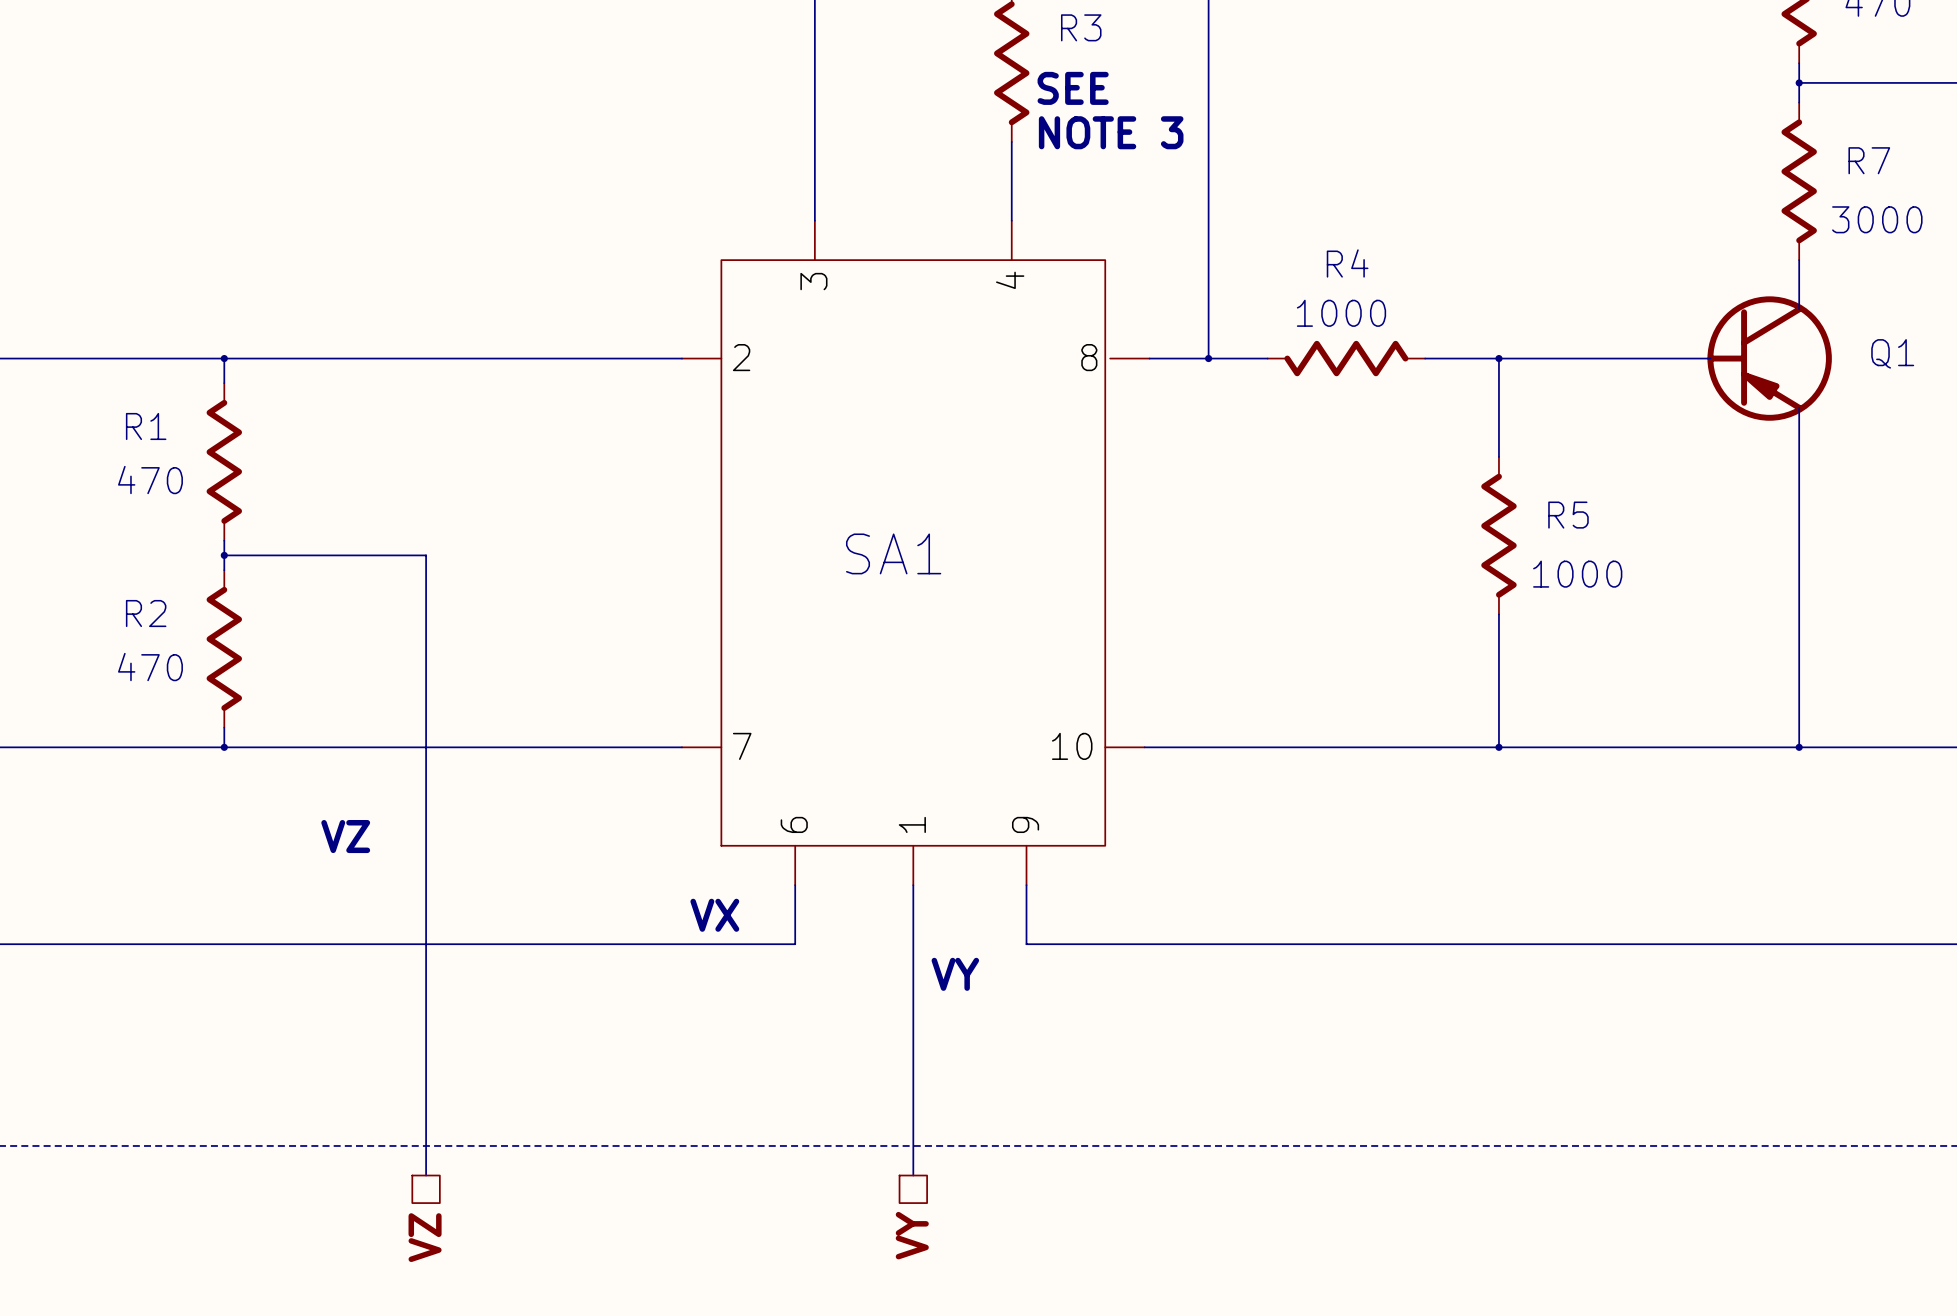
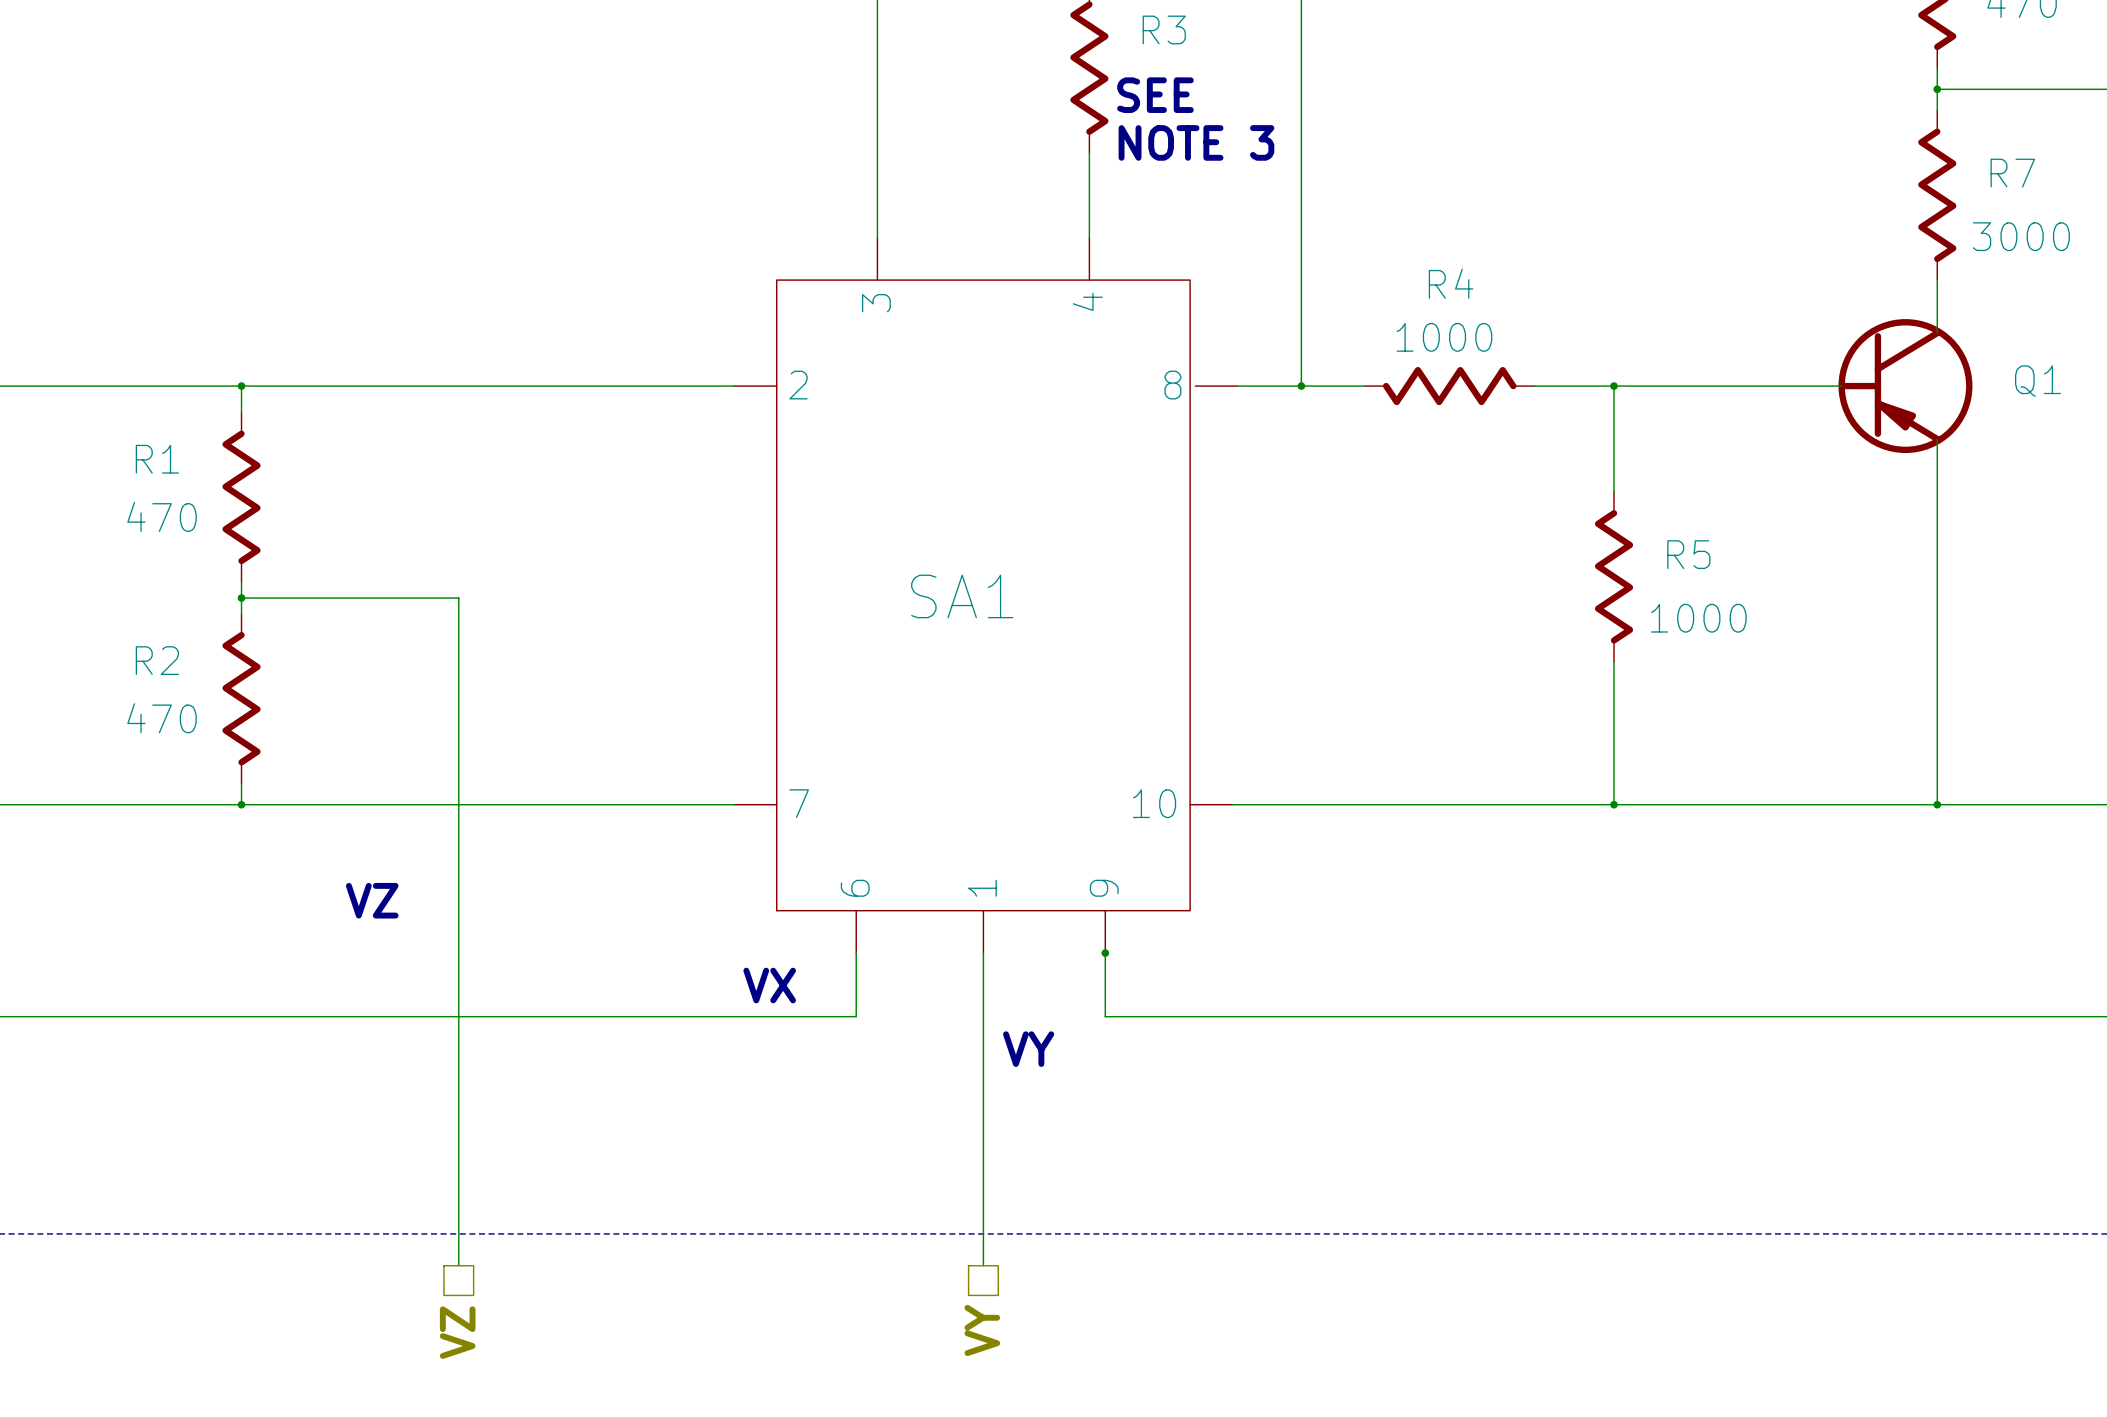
junction: none -> (1105, 953)

